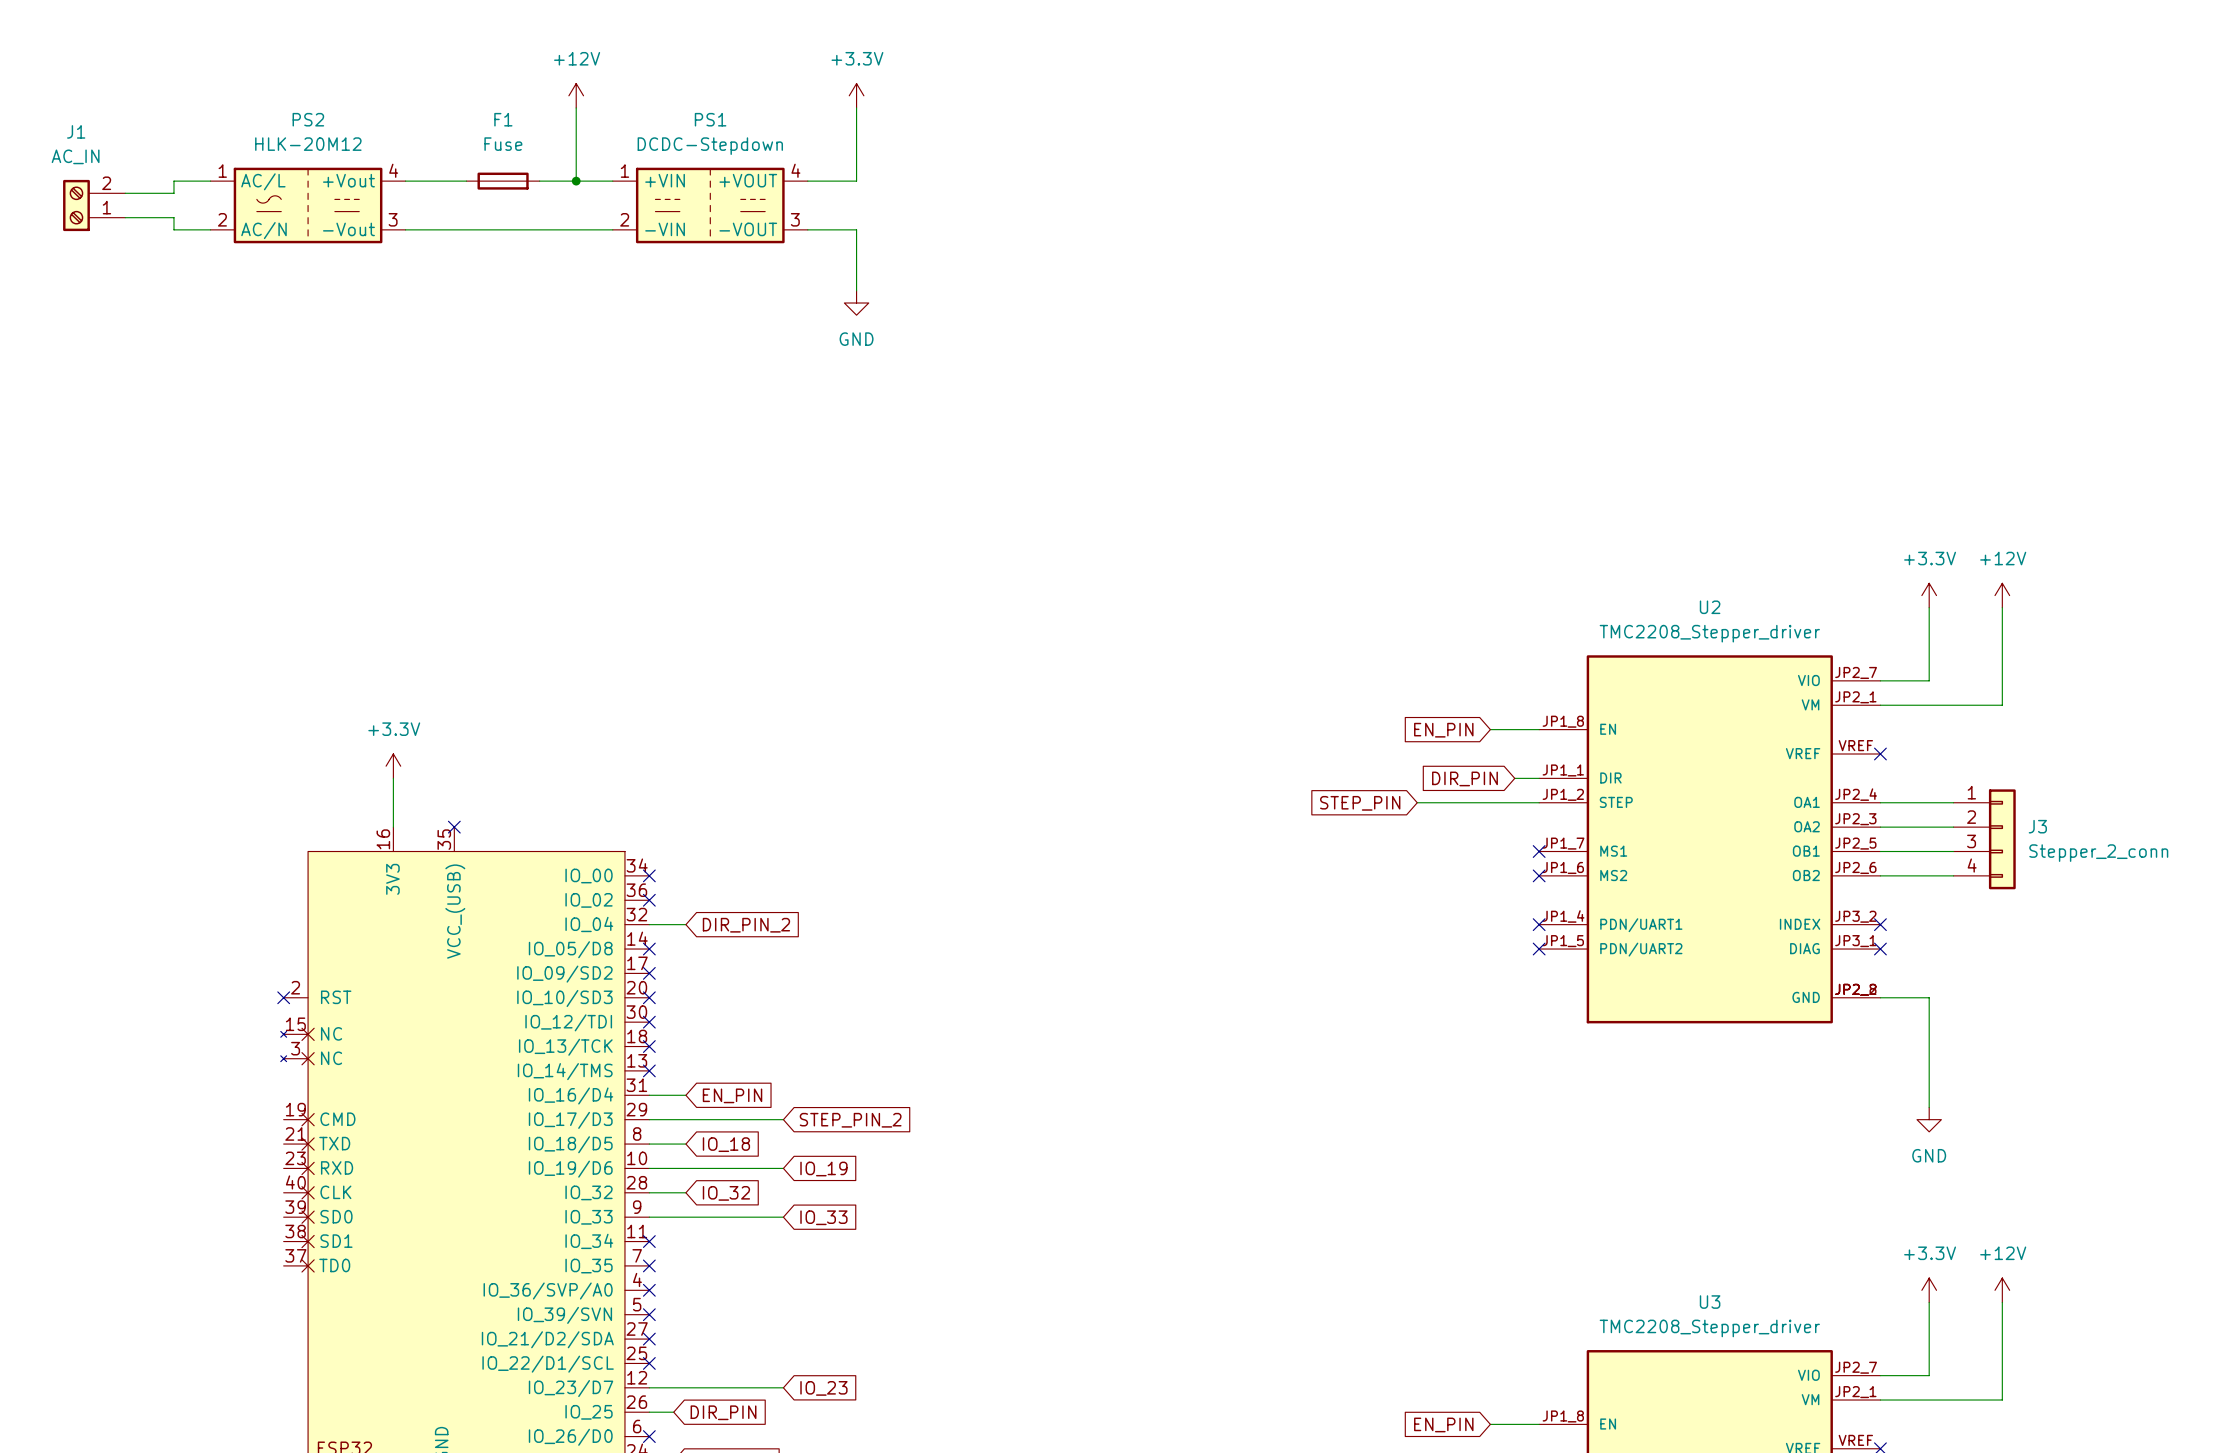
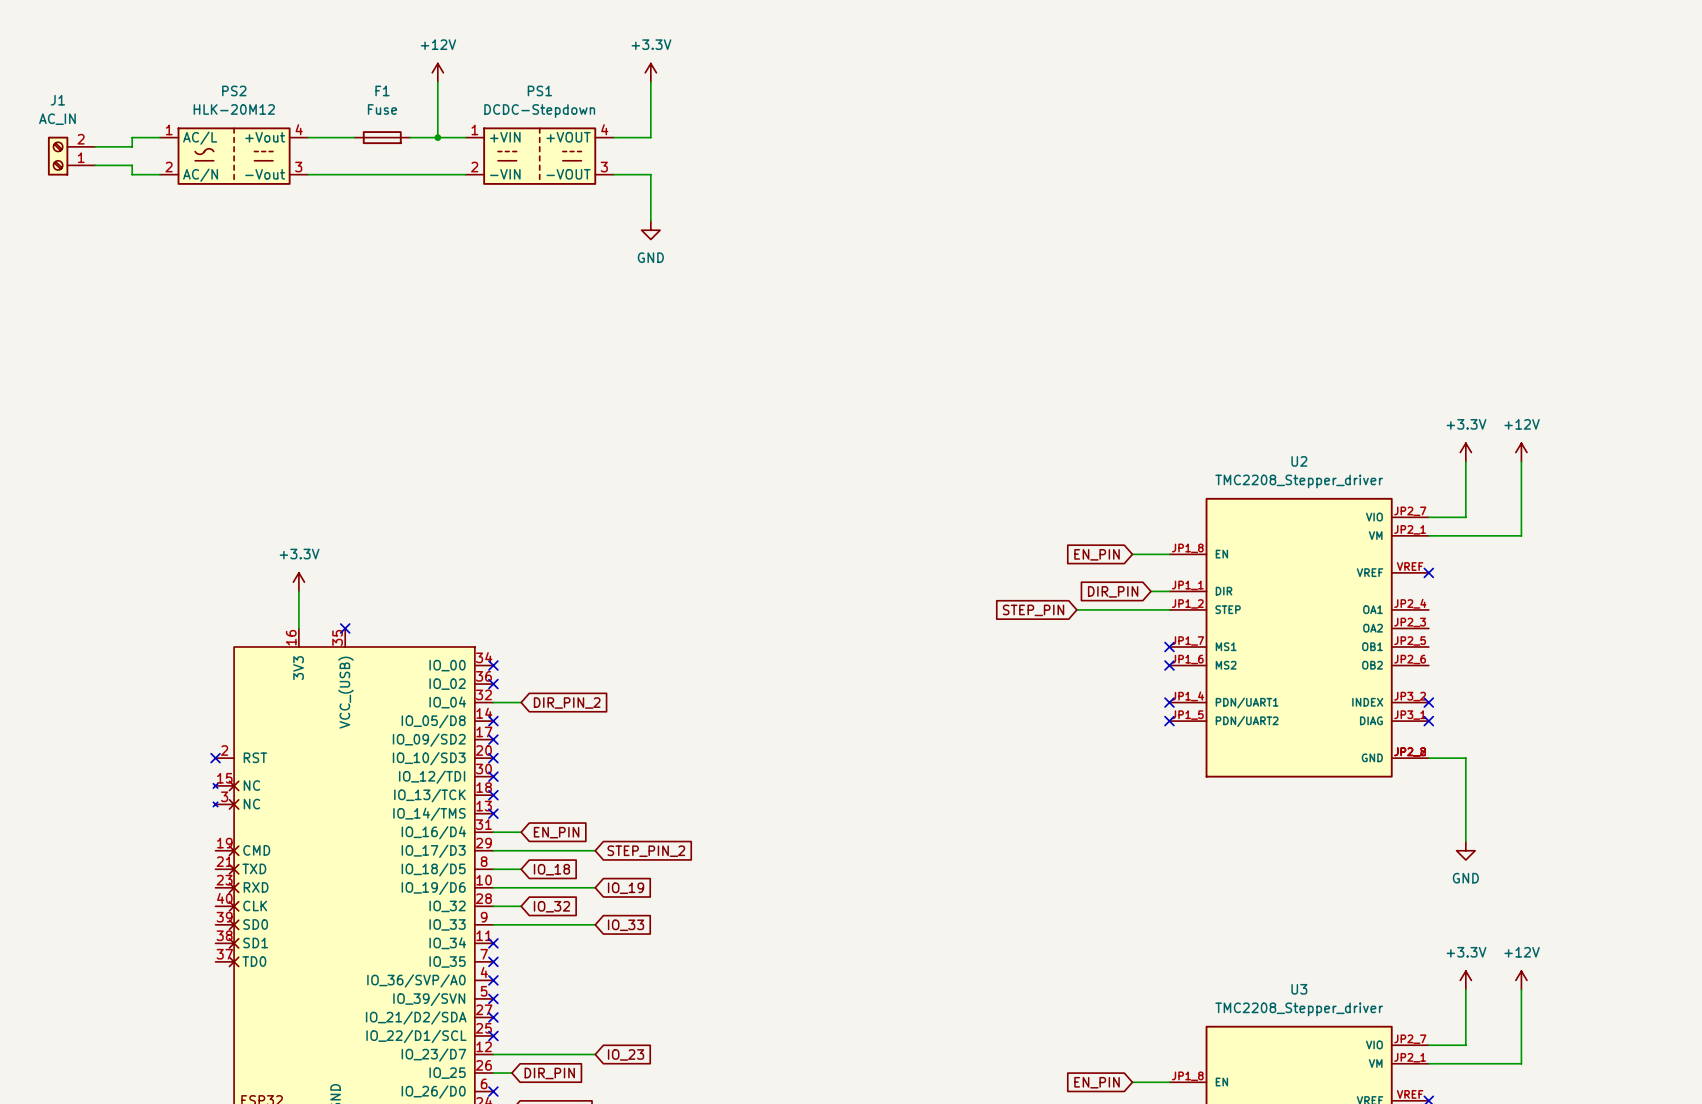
wire: (1880, 802) (1953, 802) -> none
wire: (1880, 827) (1953, 827) -> none
J3: Stepper_2_conn (1984, 839) -> none
wire: (1880, 851) (1953, 851) -> none
wire: (1880, 875) (1953, 875) -> none

